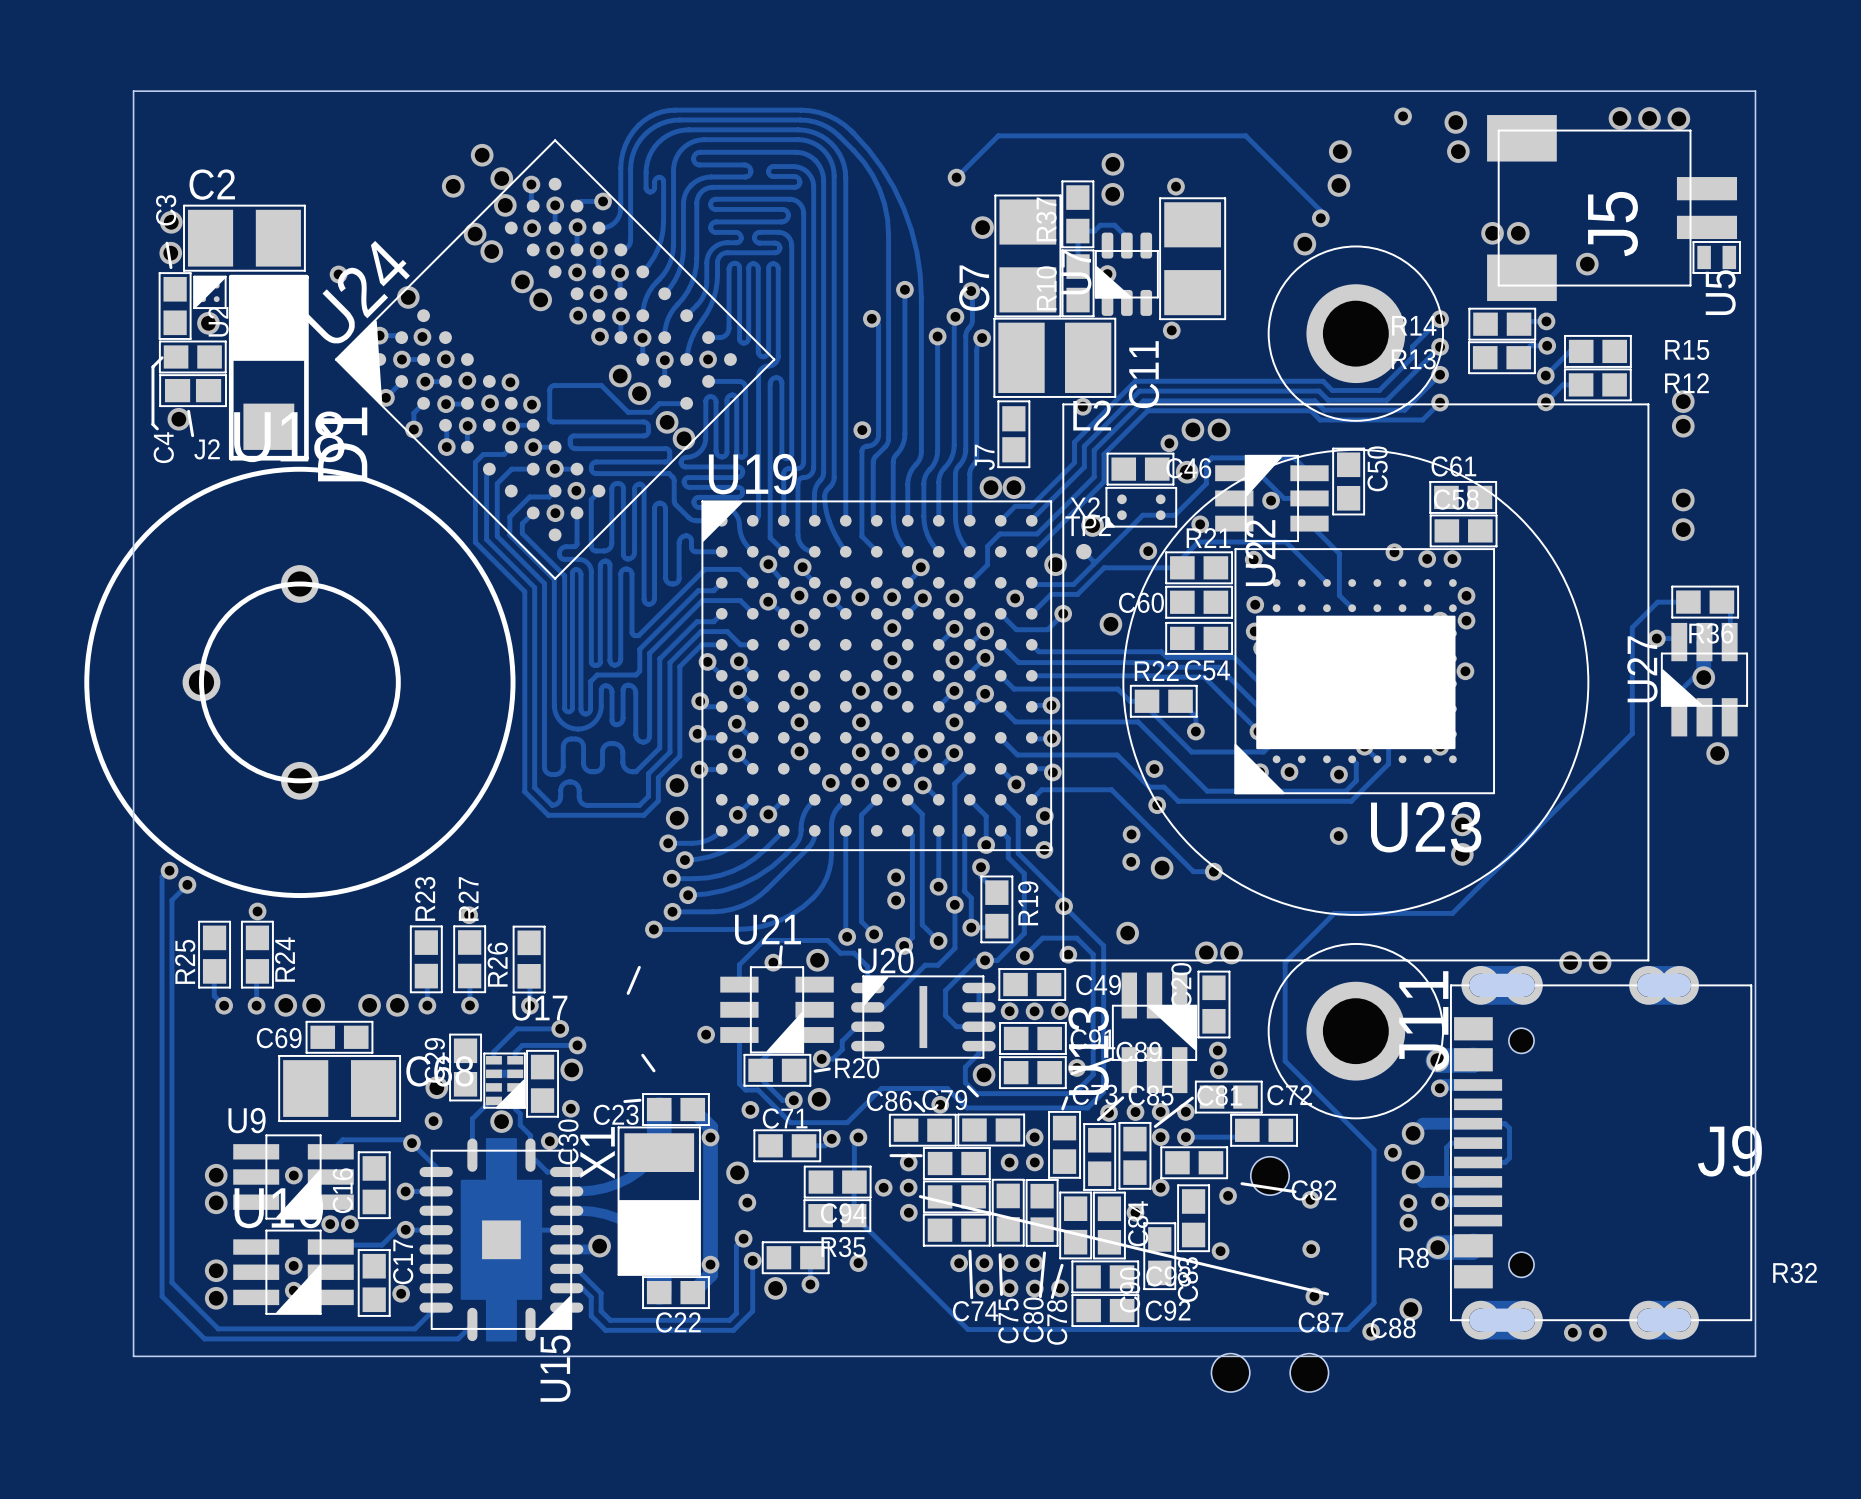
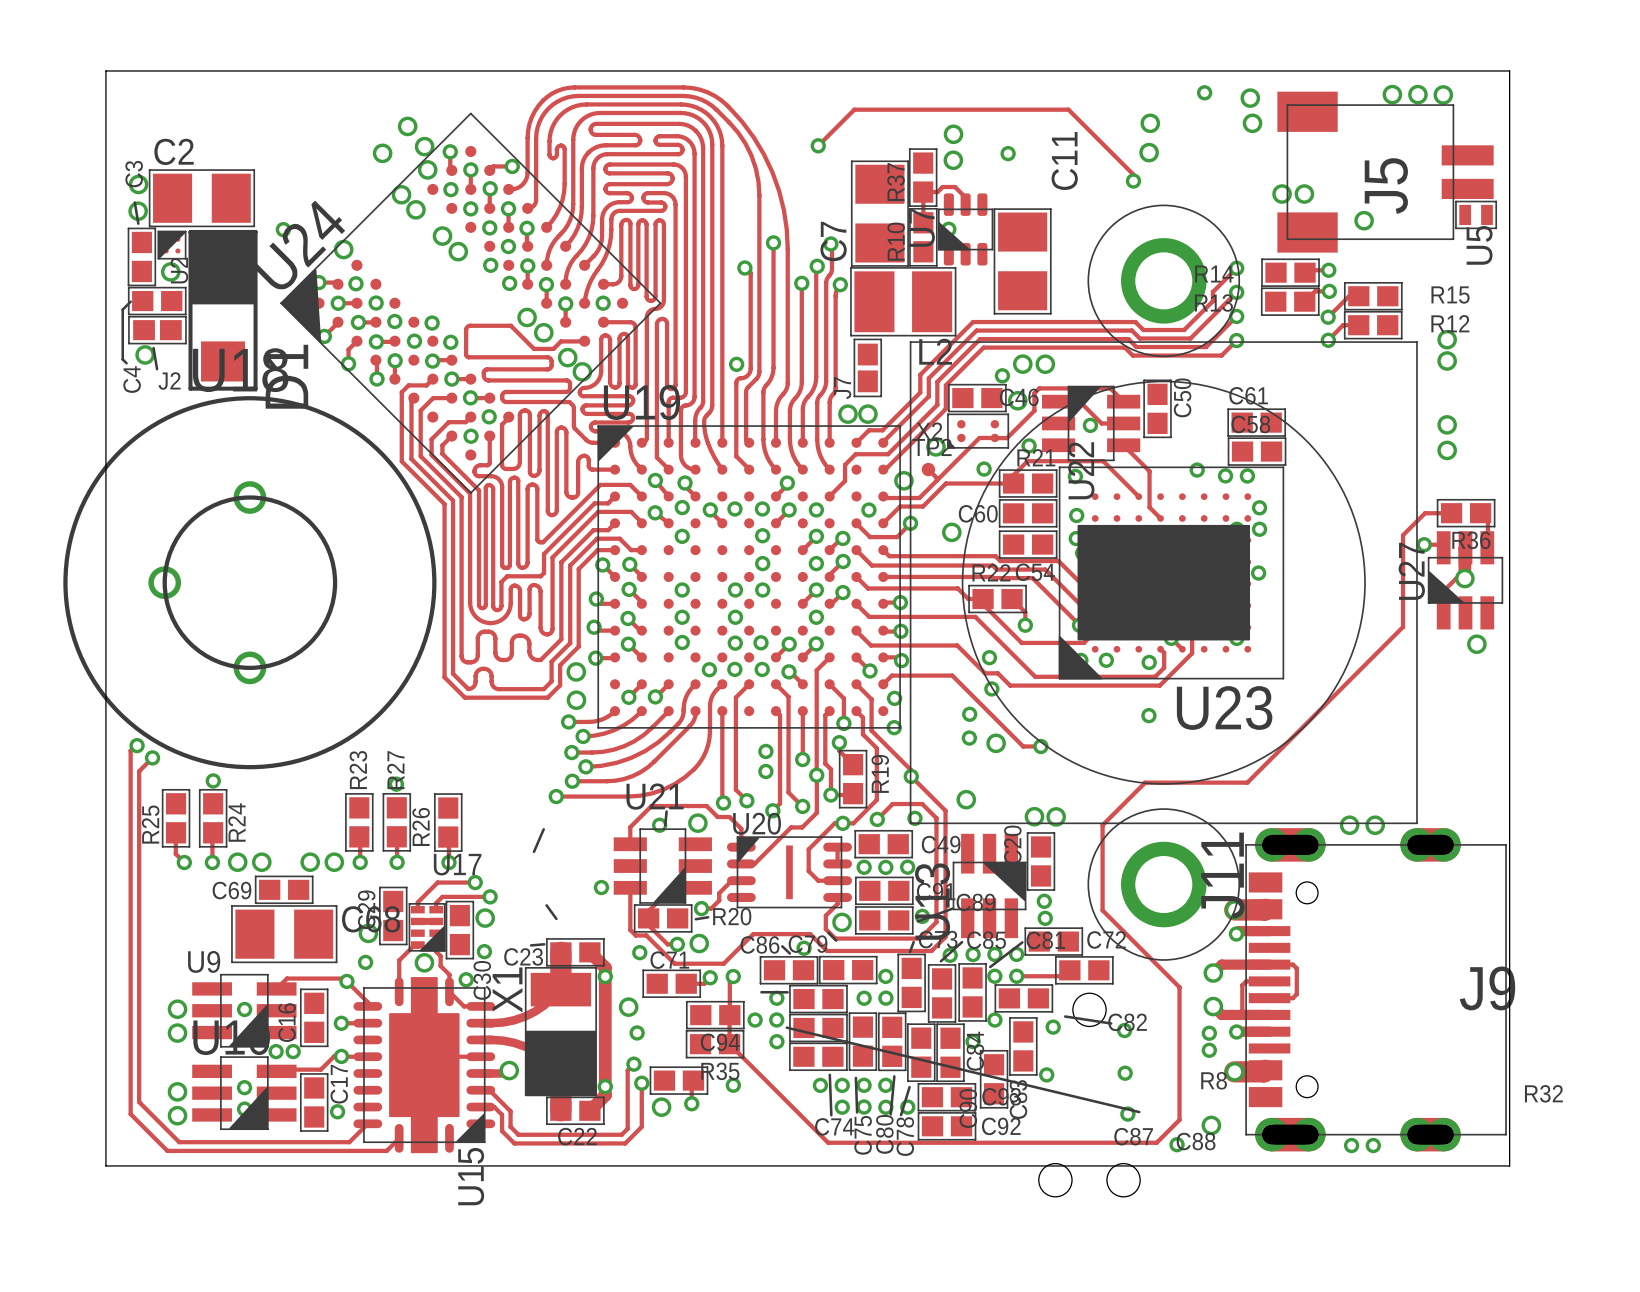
via: (982, 227) -> none
via: (1304, 244) -> none
C11 position: (1192, 258) -> (1022, 261)
via: (1171, 330) -> none
C11 name position: C11 (1144, 374) -> C11 (1064, 161)
via: (1082, 406) -> none
via: (1462, 824) -> none
via: (1462, 854) -> none
via: (1392, 1152) -> none

